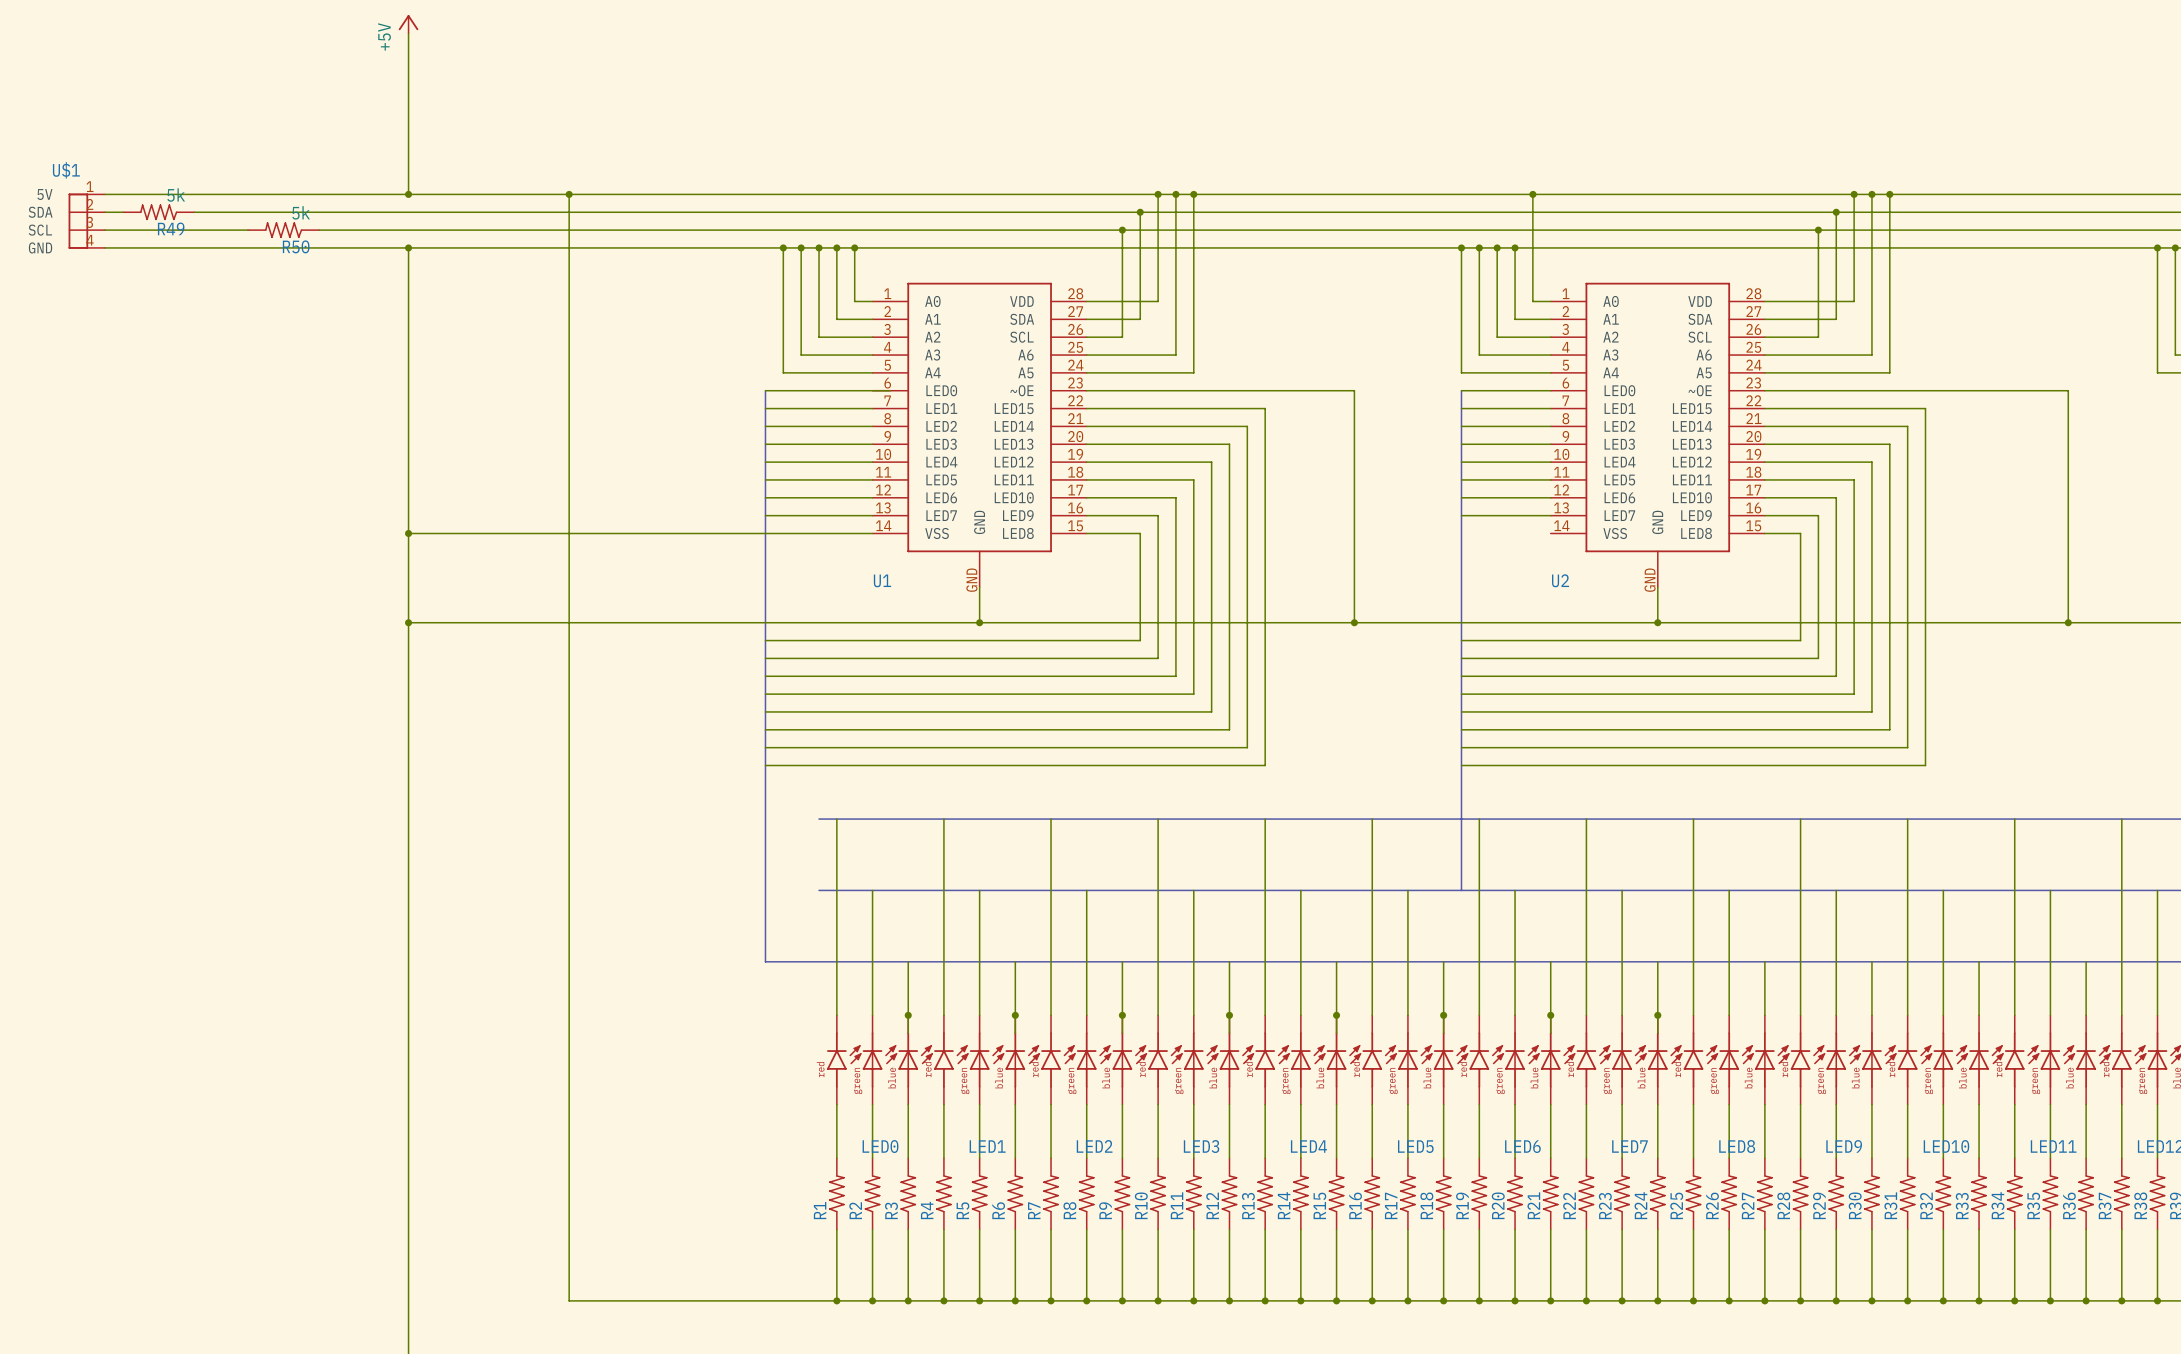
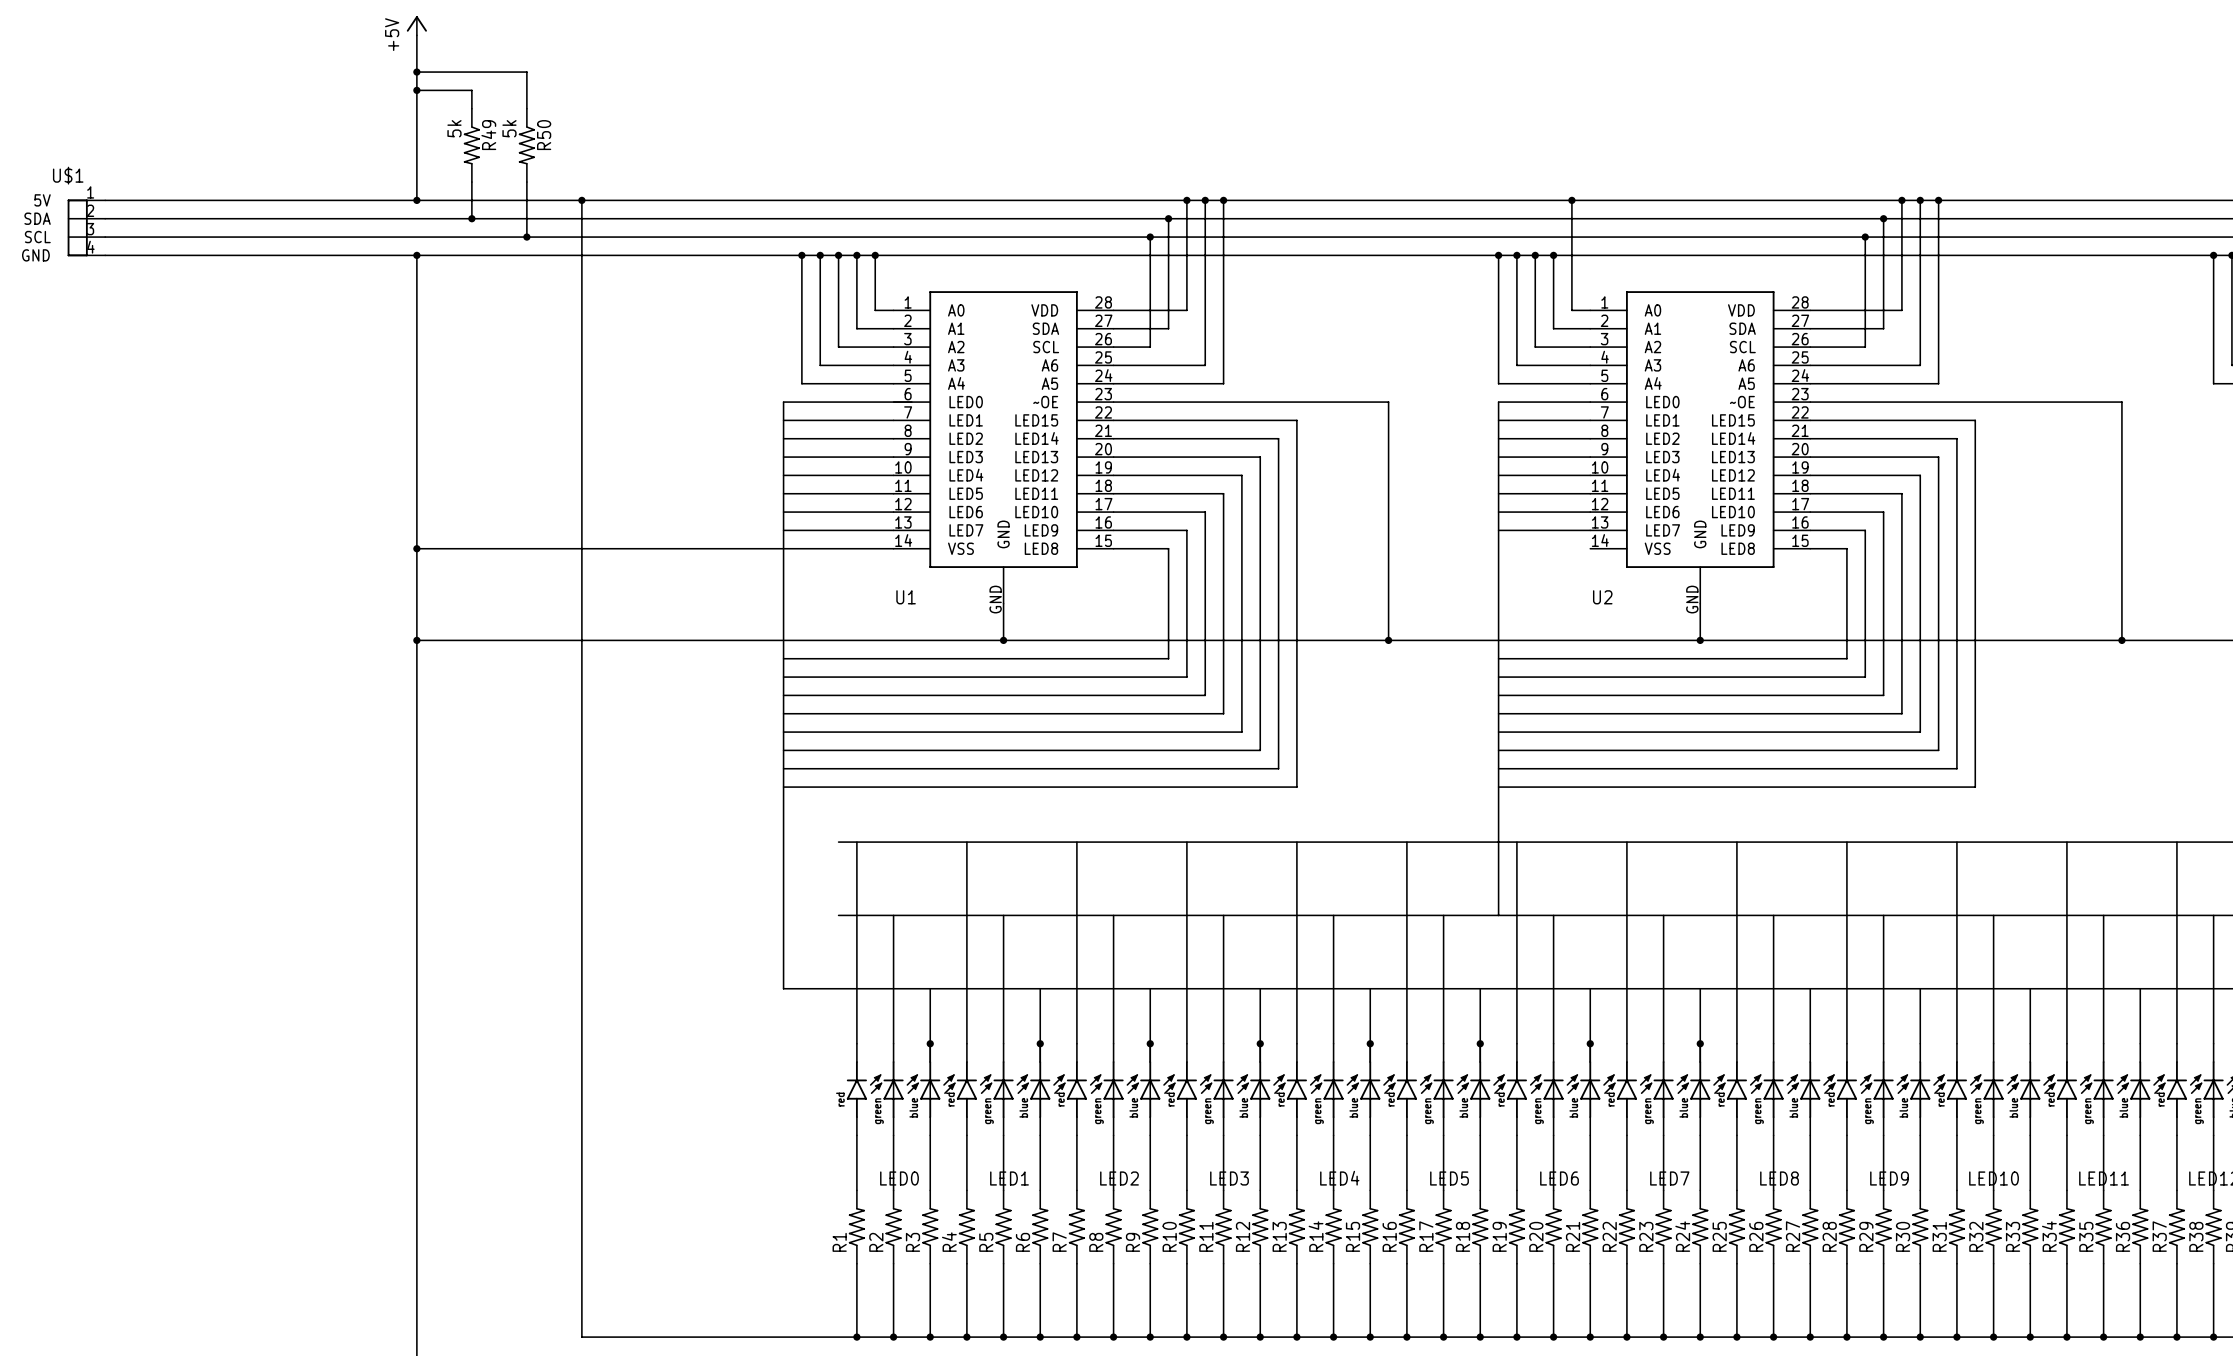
wire: none -> (416, 72) (526, 72) (526, 108)
junction: none -> (416, 72)
wire: none -> (416, 90) (471, 90) (471, 108)
junction: none -> (416, 90)
wire: none -> (471, 182) (471, 218)
wire: none -> (526, 182) (526, 237)
R49 rotation: 0° (158, 212) -> 90° counterclockwise (471, 145)
R49 position: (158, 212) -> (471, 145)
junction: none -> (471, 218)
R50 rotation: 0° (283, 230) -> 90° counterclockwise (526, 145)
R50 position: (283, 230) -> (526, 145)
junction: none -> (526, 237)

